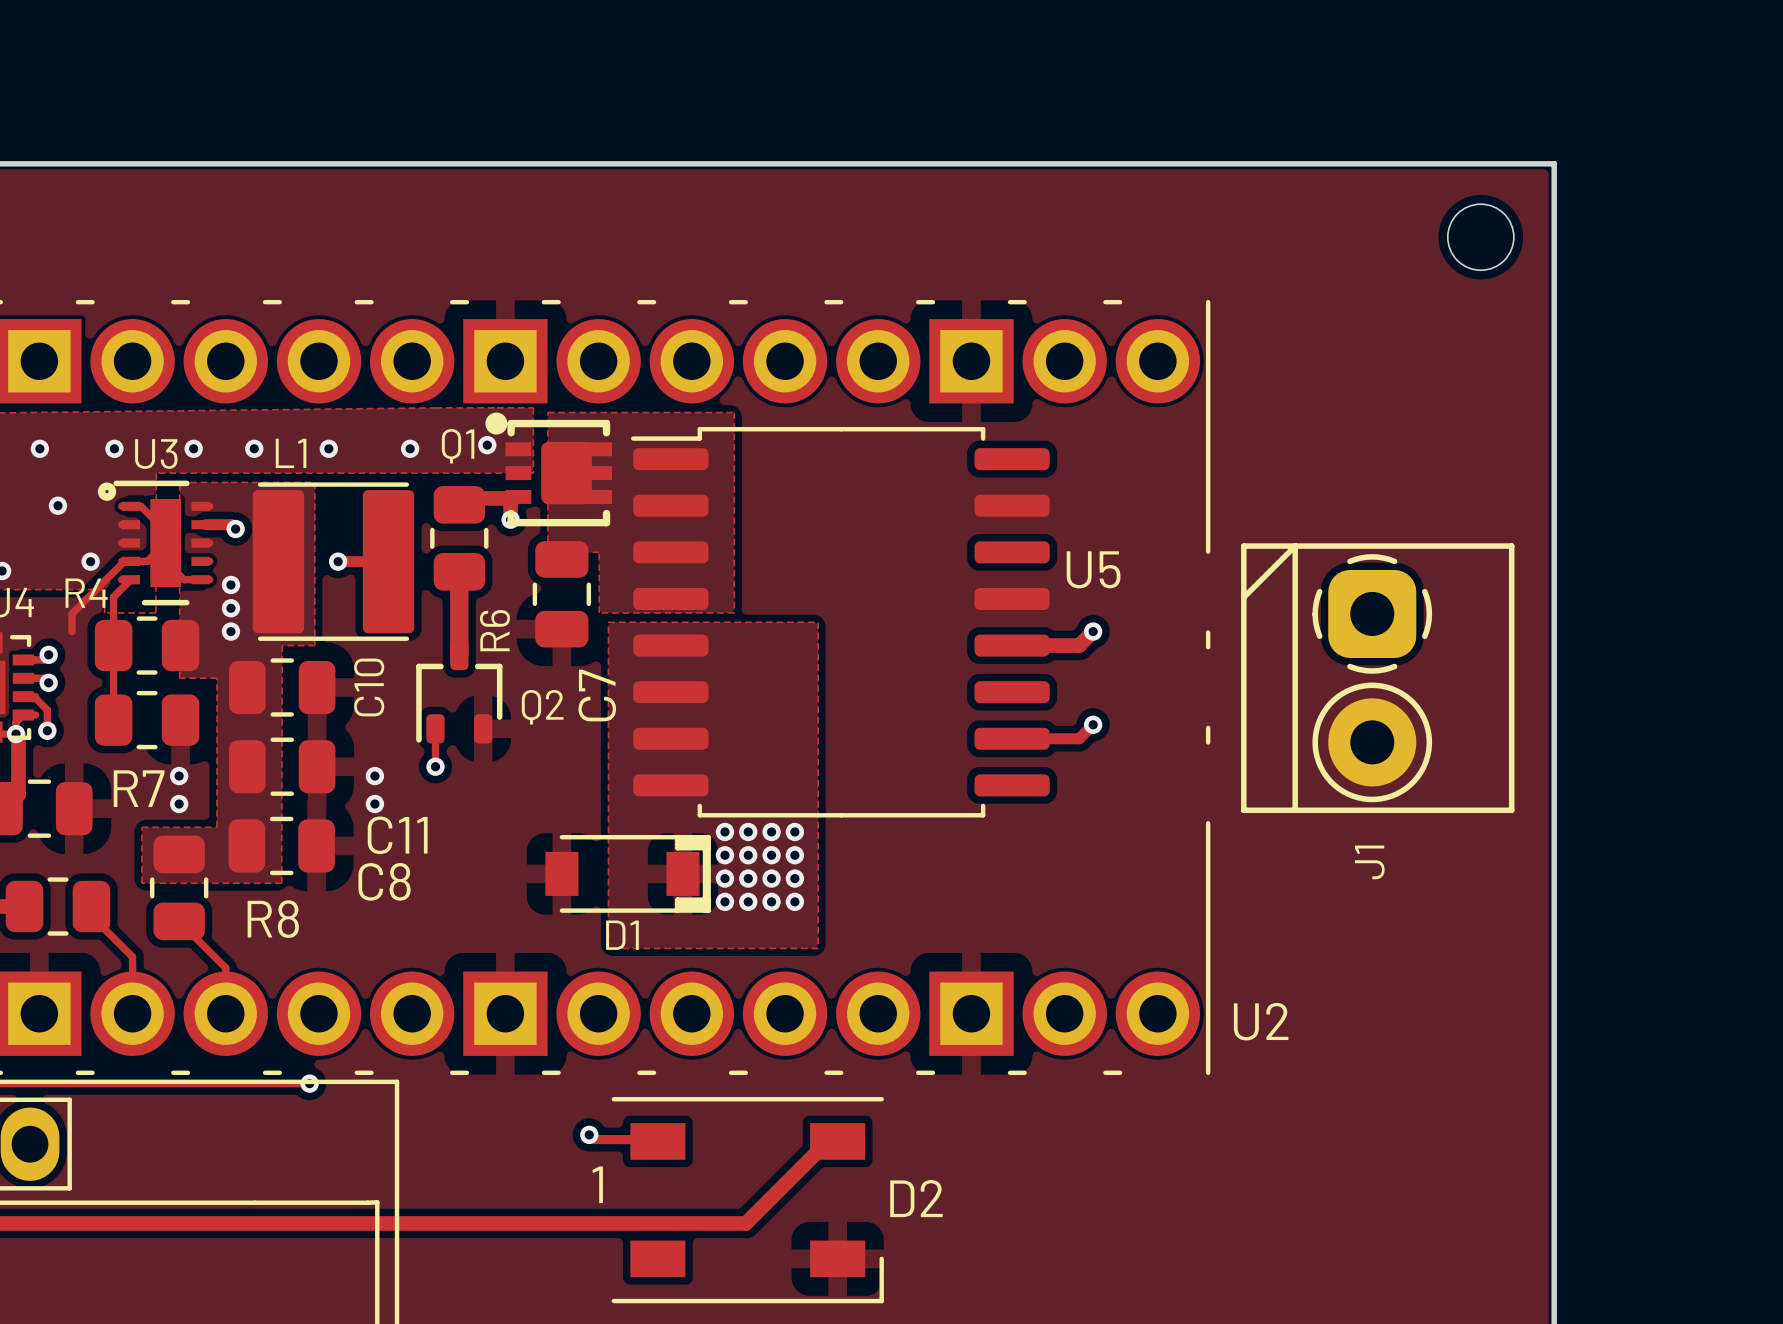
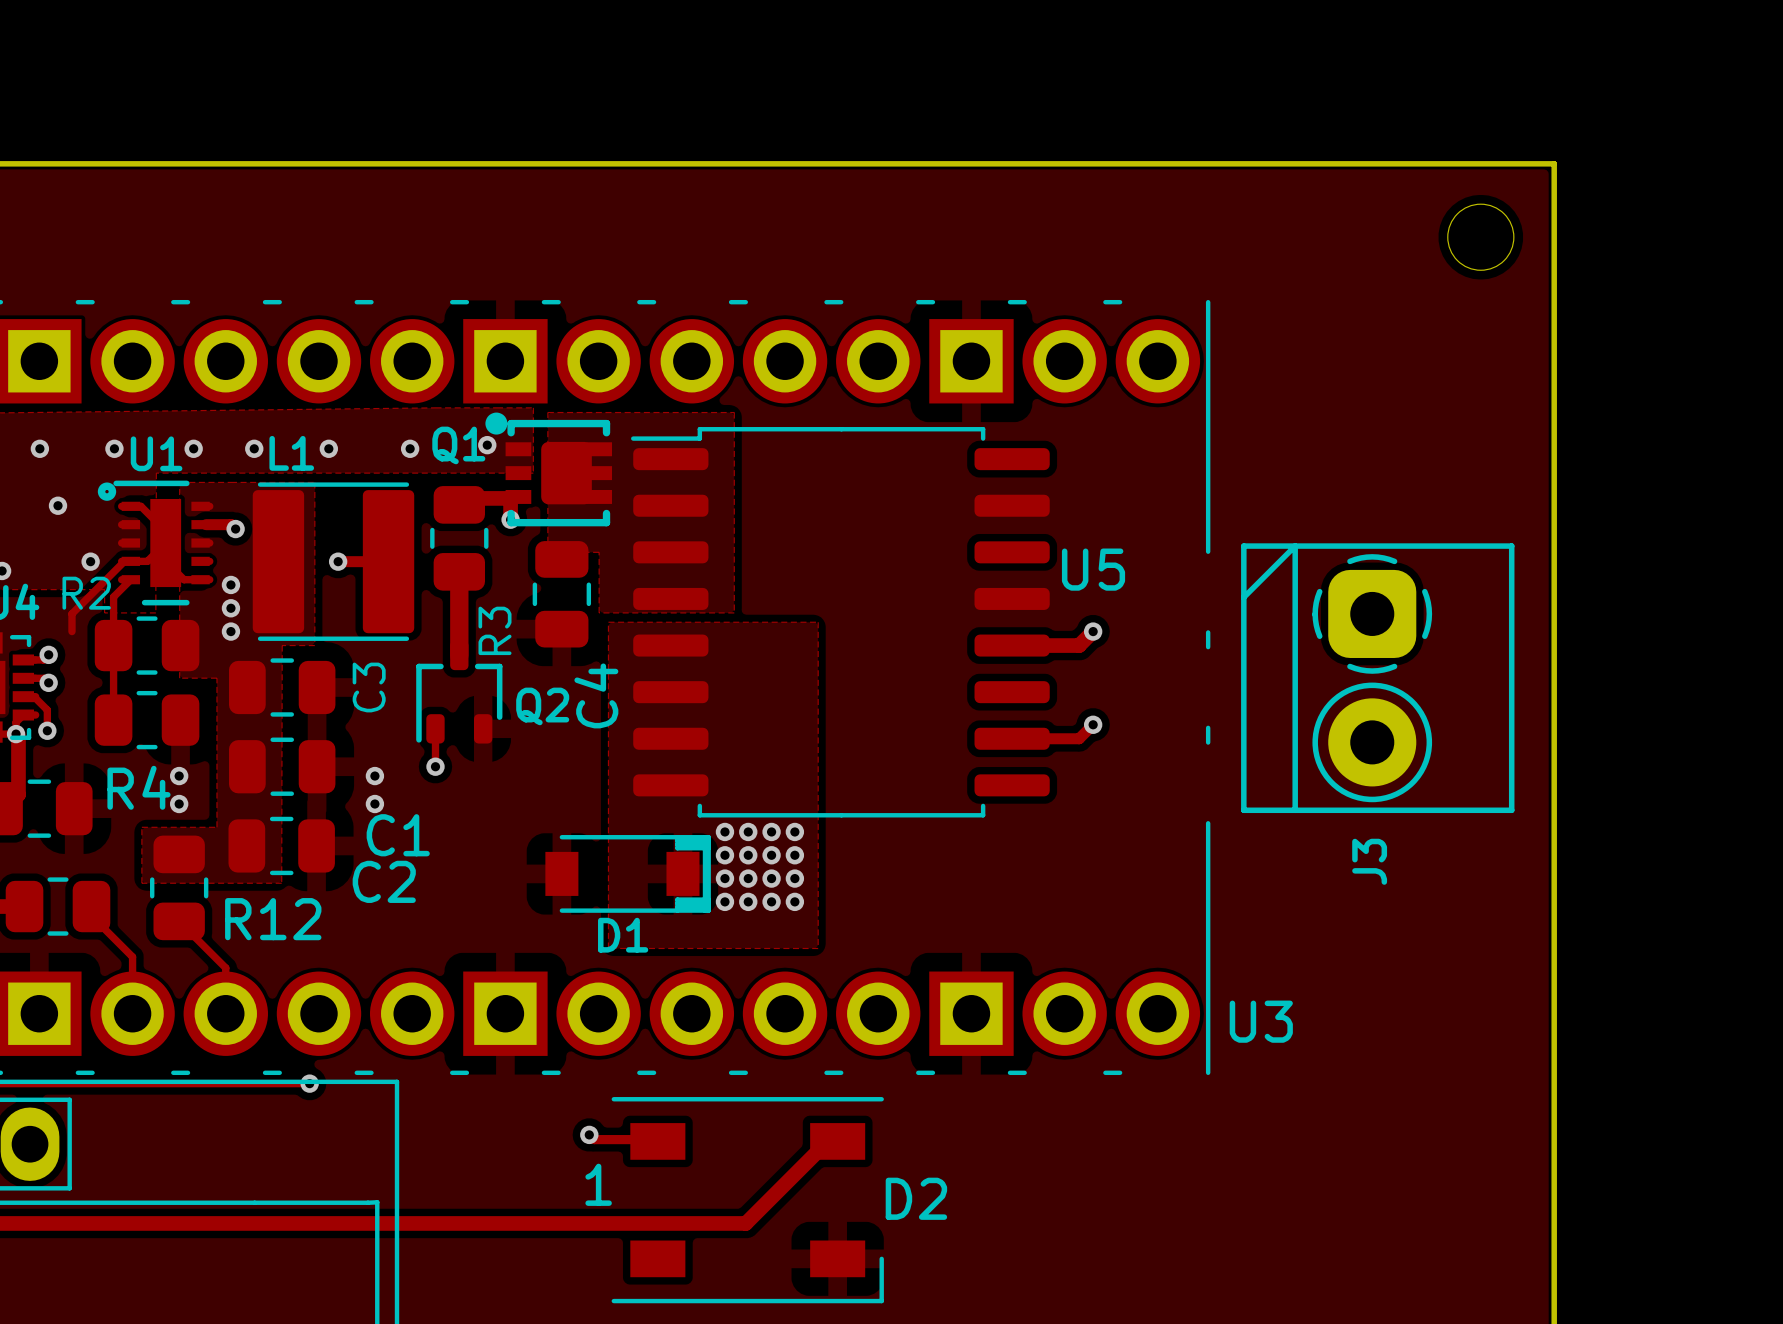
U3 name: U3 (156, 454) -> U1 (156, 453)
R4 name: R4 (86, 593) -> R2 (86, 593)
R6 name: R6 (494, 630) -> R3 (494, 630)
C10 name: C10 (369, 687) -> C3 (369, 687)
C7 name: C7 (597, 695) -> C4 (596, 695)
R7 name: R7 (139, 788) -> R4 (138, 787)
C11 name: C11 (397, 835) -> C1 (398, 835)
J1 name: J1 (1369, 862) -> J3 (1369, 861)
C8 name: C8 (384, 881) -> C2 (384, 881)
R8 name: R8 (273, 919) -> R12 (273, 919)
U2 name: U2 (1261, 1021) -> U3 (1261, 1021)

